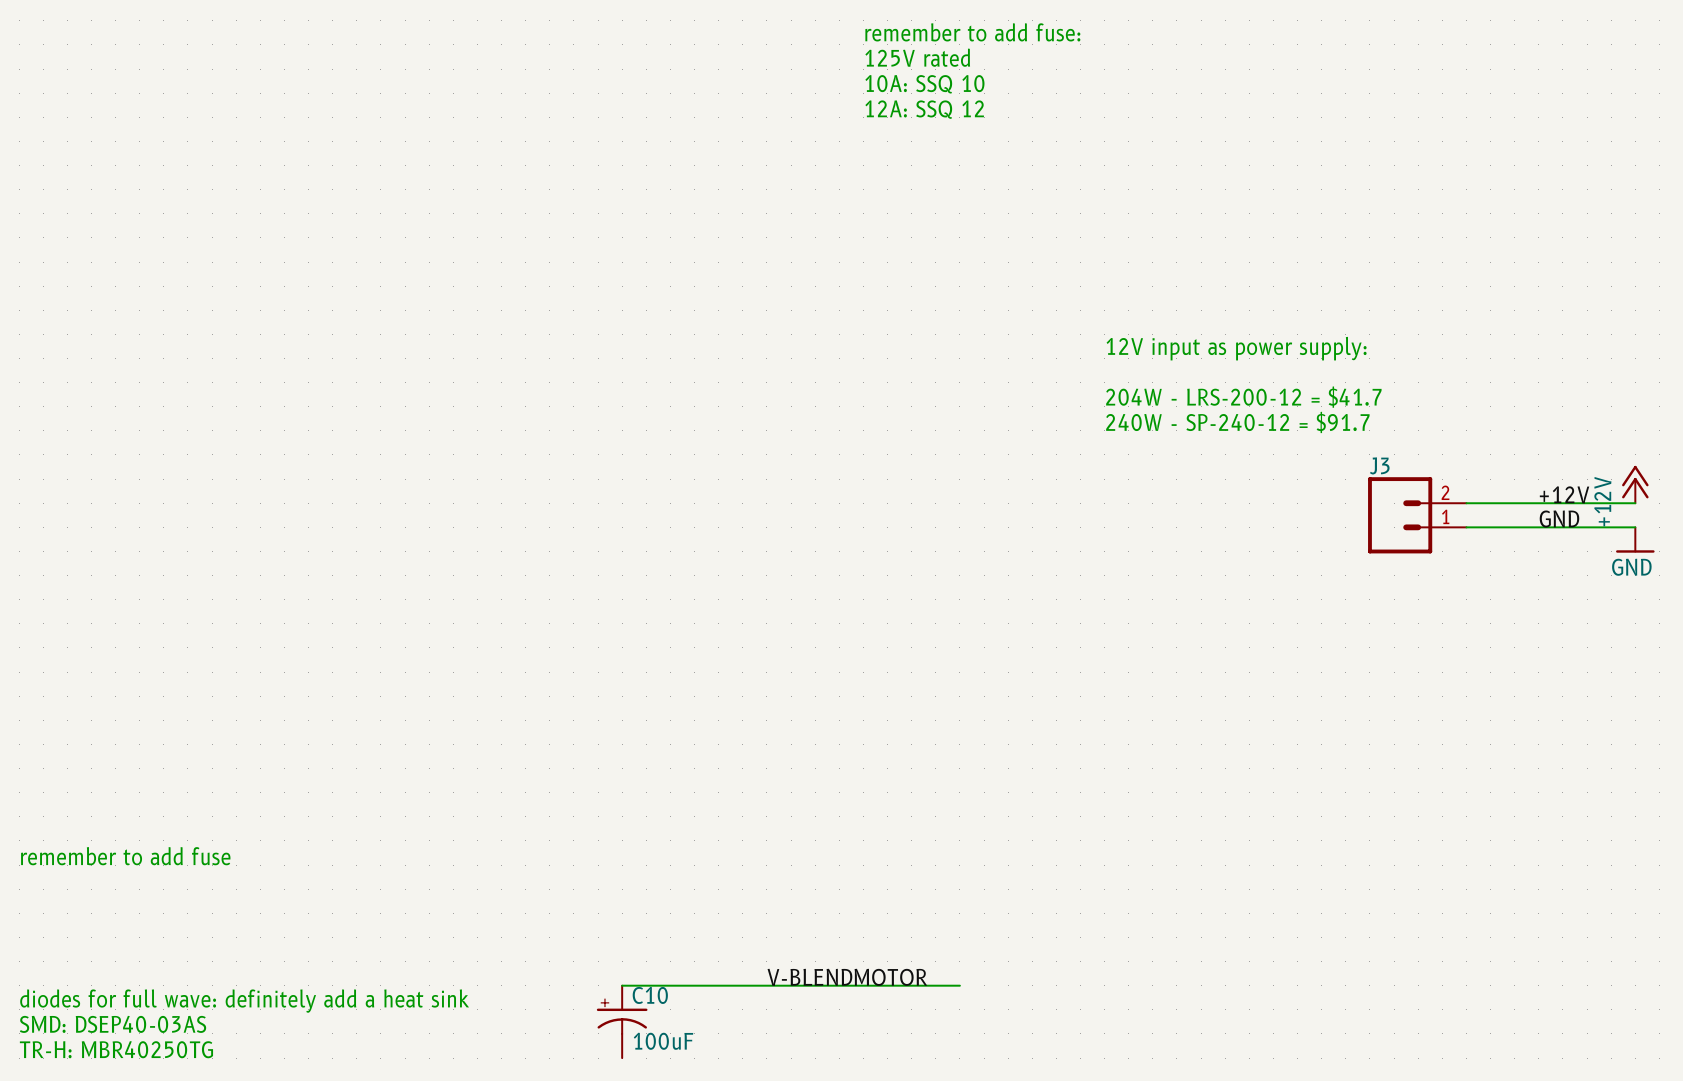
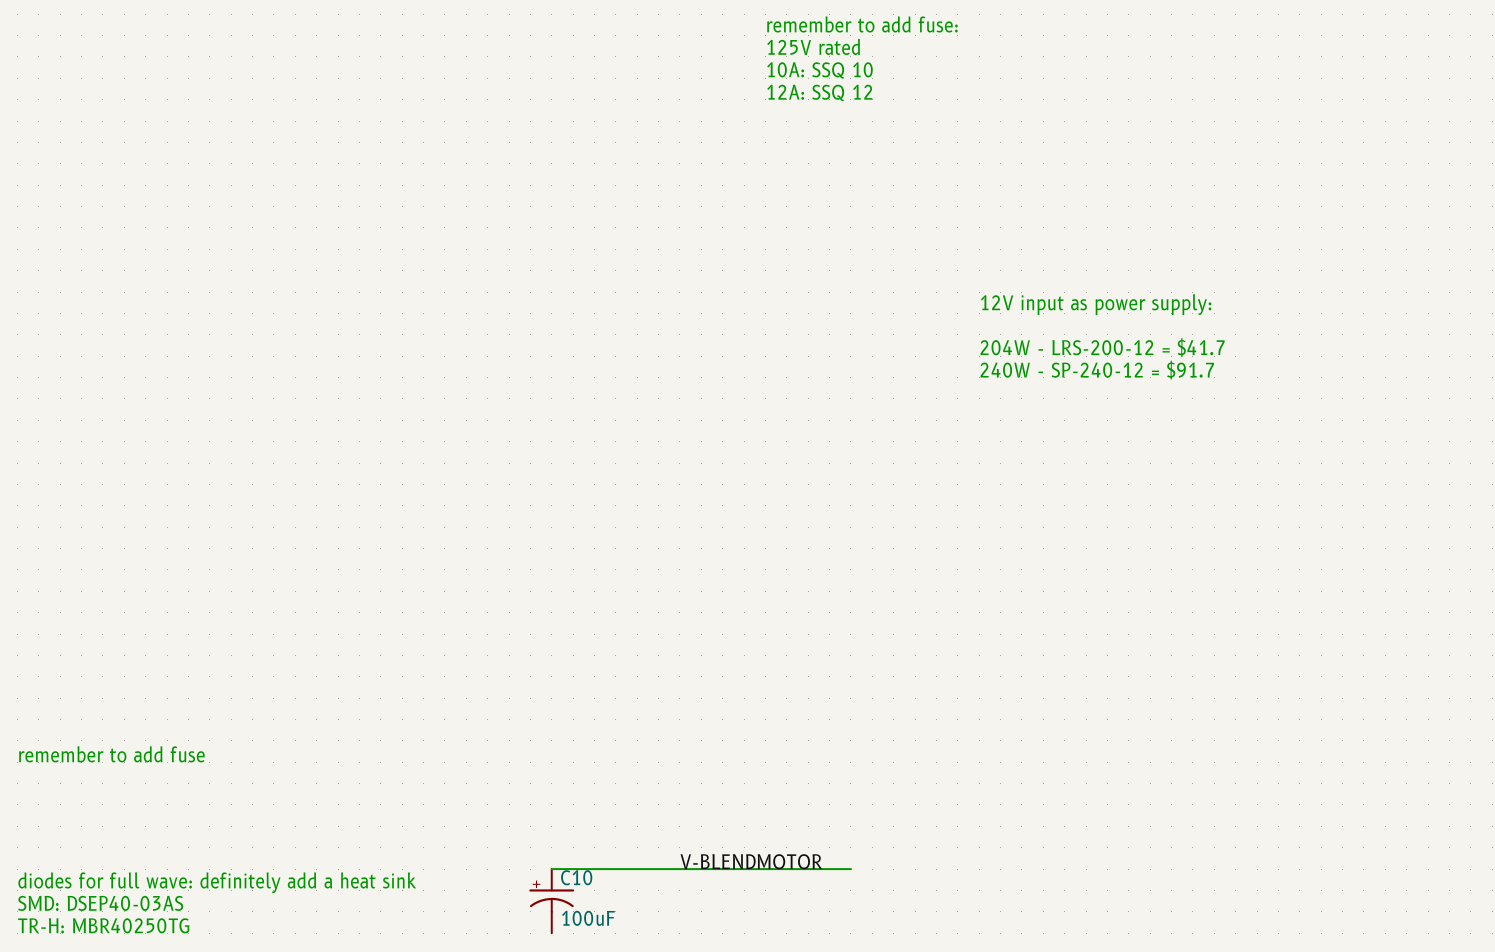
power symbol: +12V (1635, 484) -> none
label: +12V (1564, 494) -> none
wire: (1466, 503) (1635, 503) -> none
J3: (1417, 515) -> none
label: GND (1559, 519) -> none
wire: (1466, 527) (1635, 527) -> none
power symbol: GND (1635, 540) -> none

